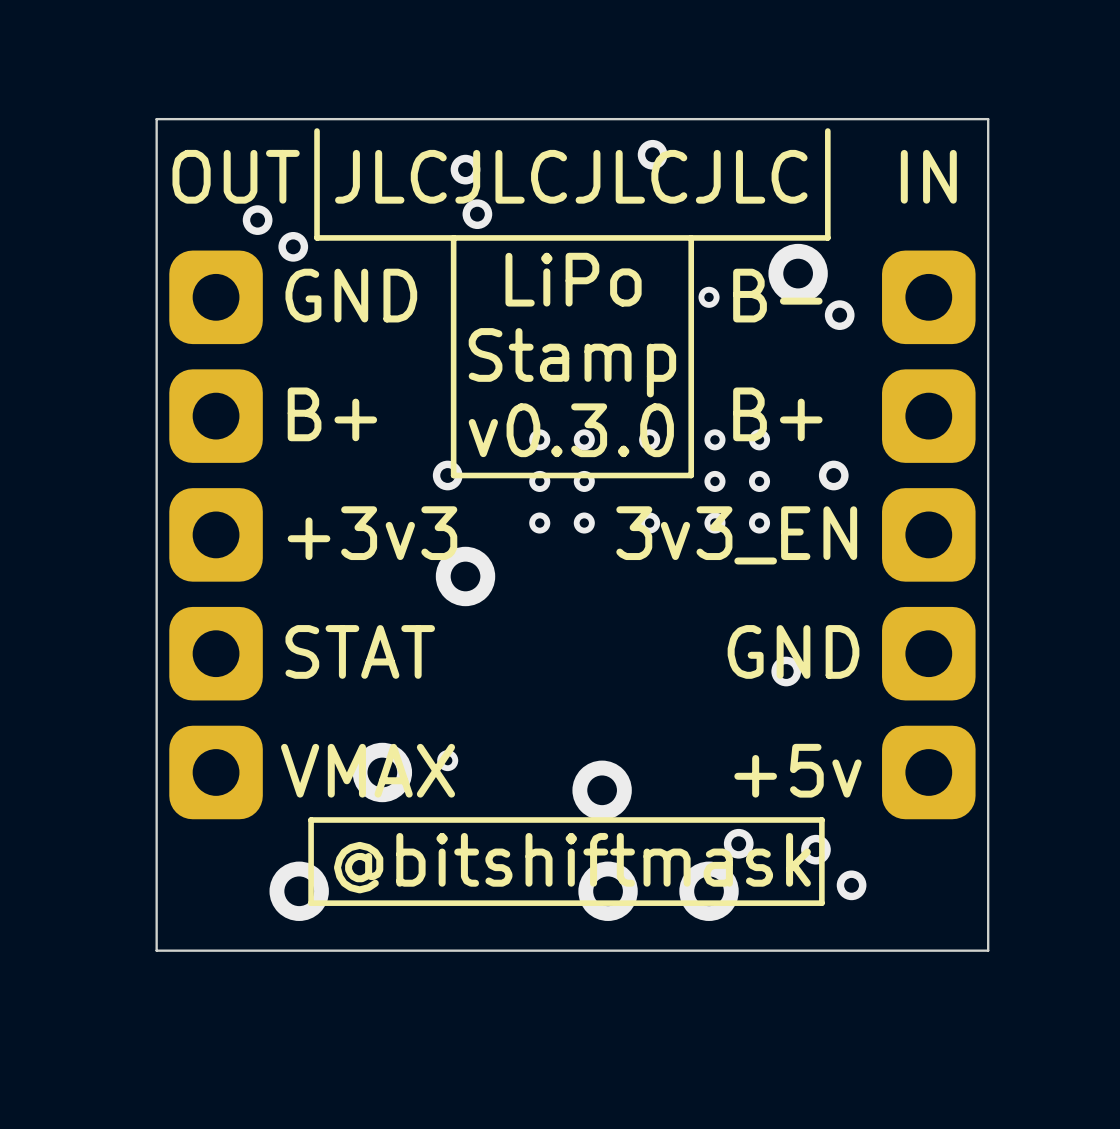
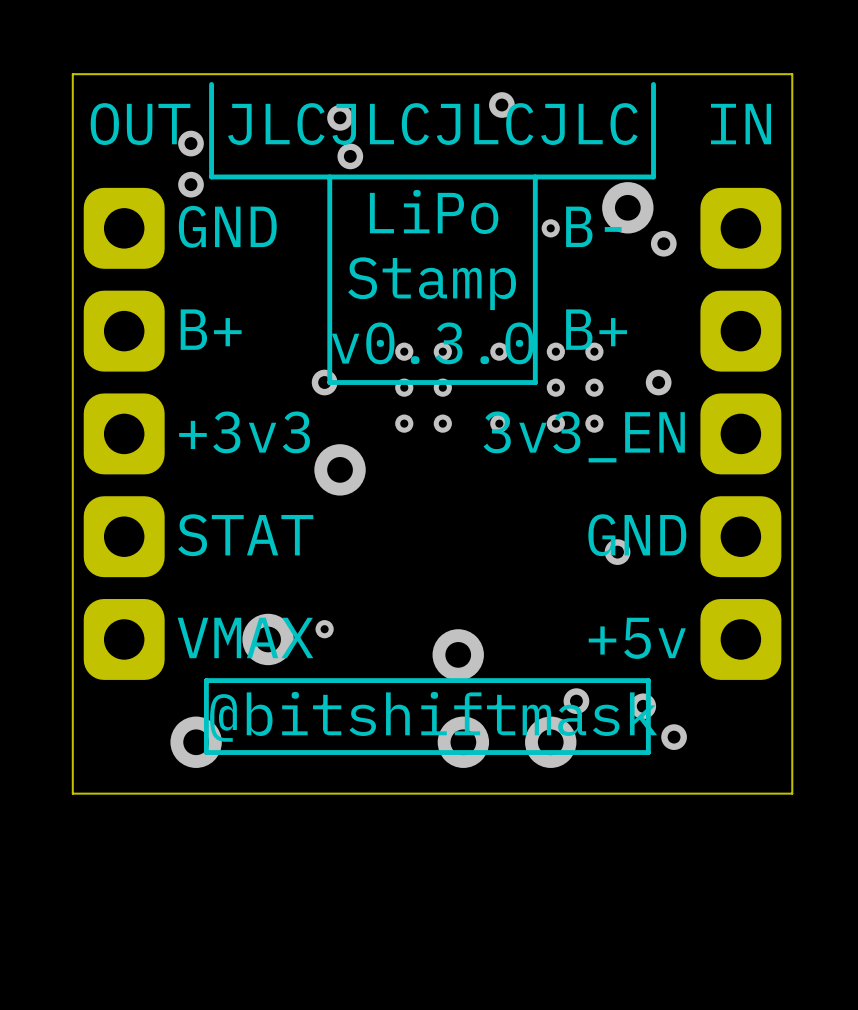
via position: (257, 220) -> (191, 143)

